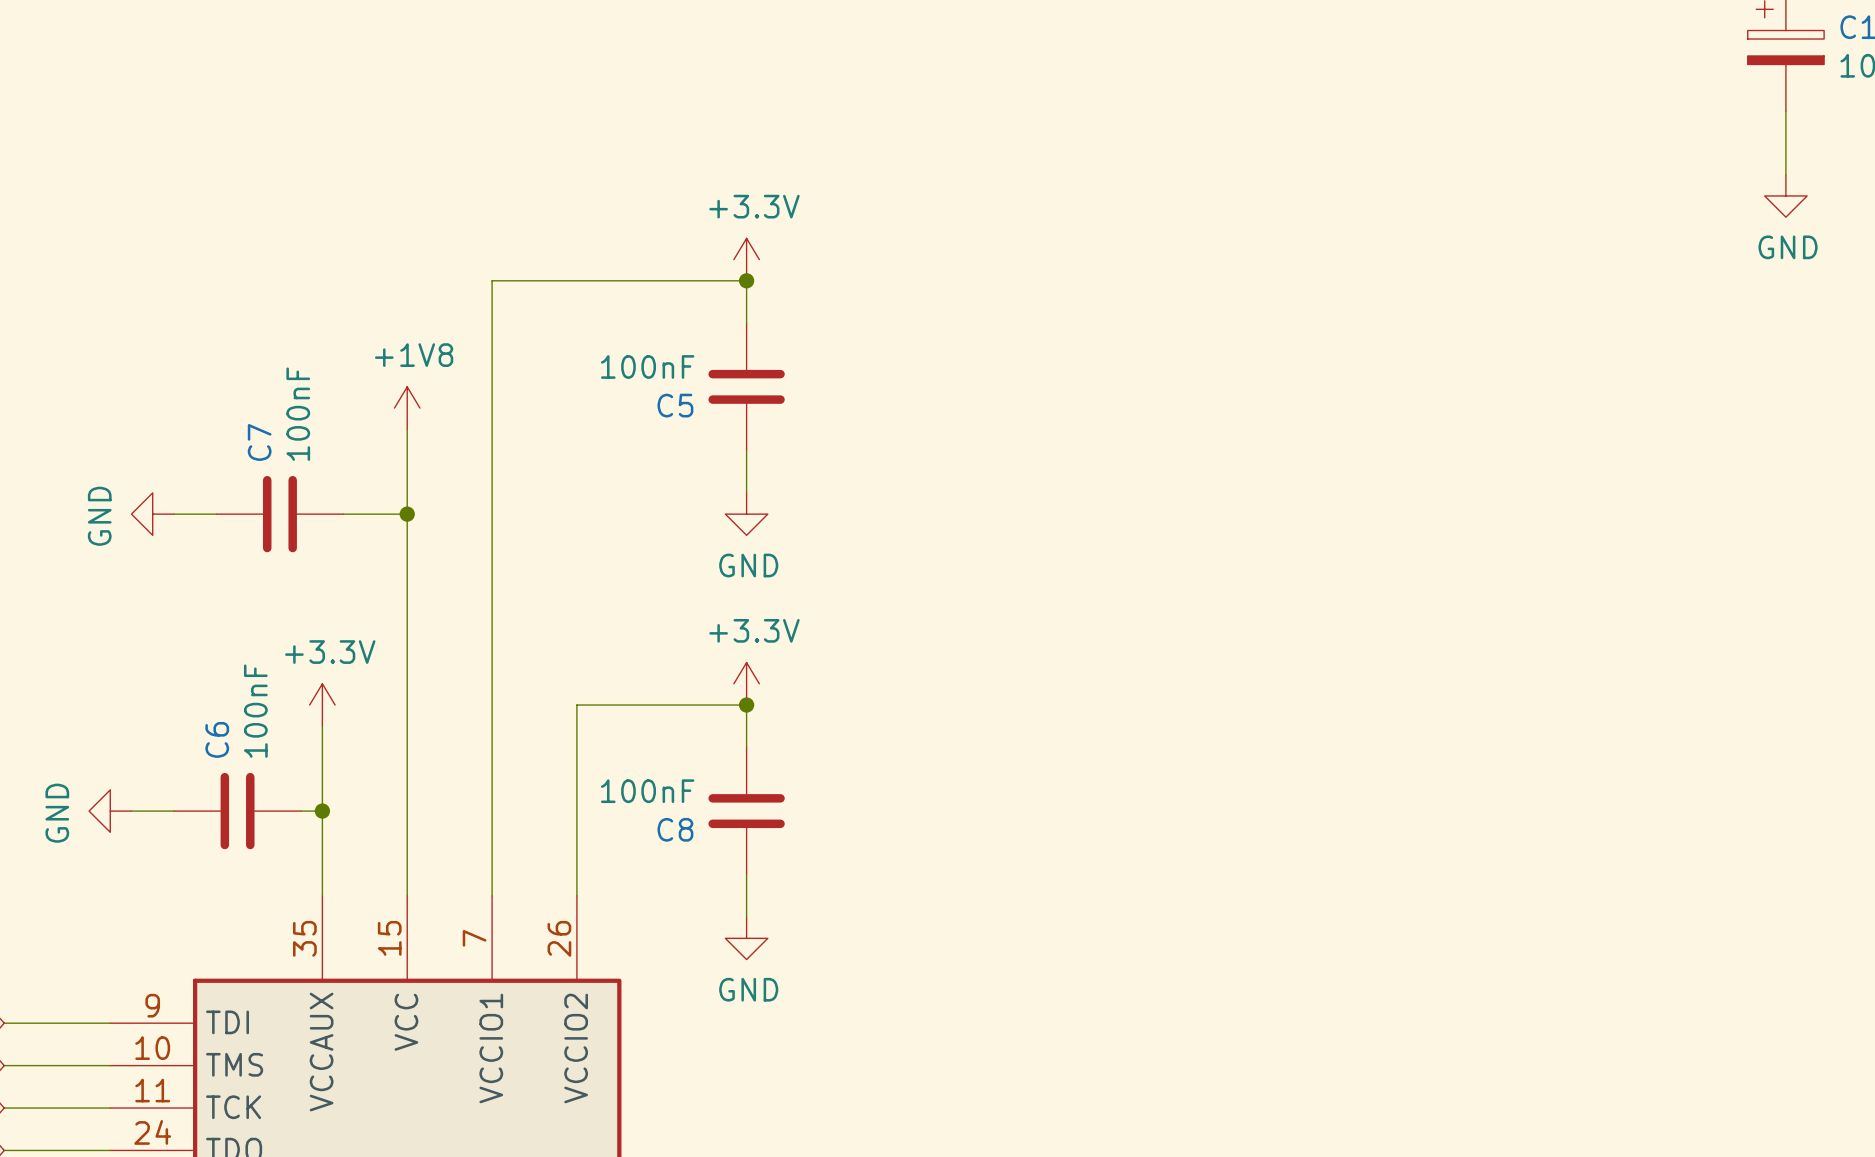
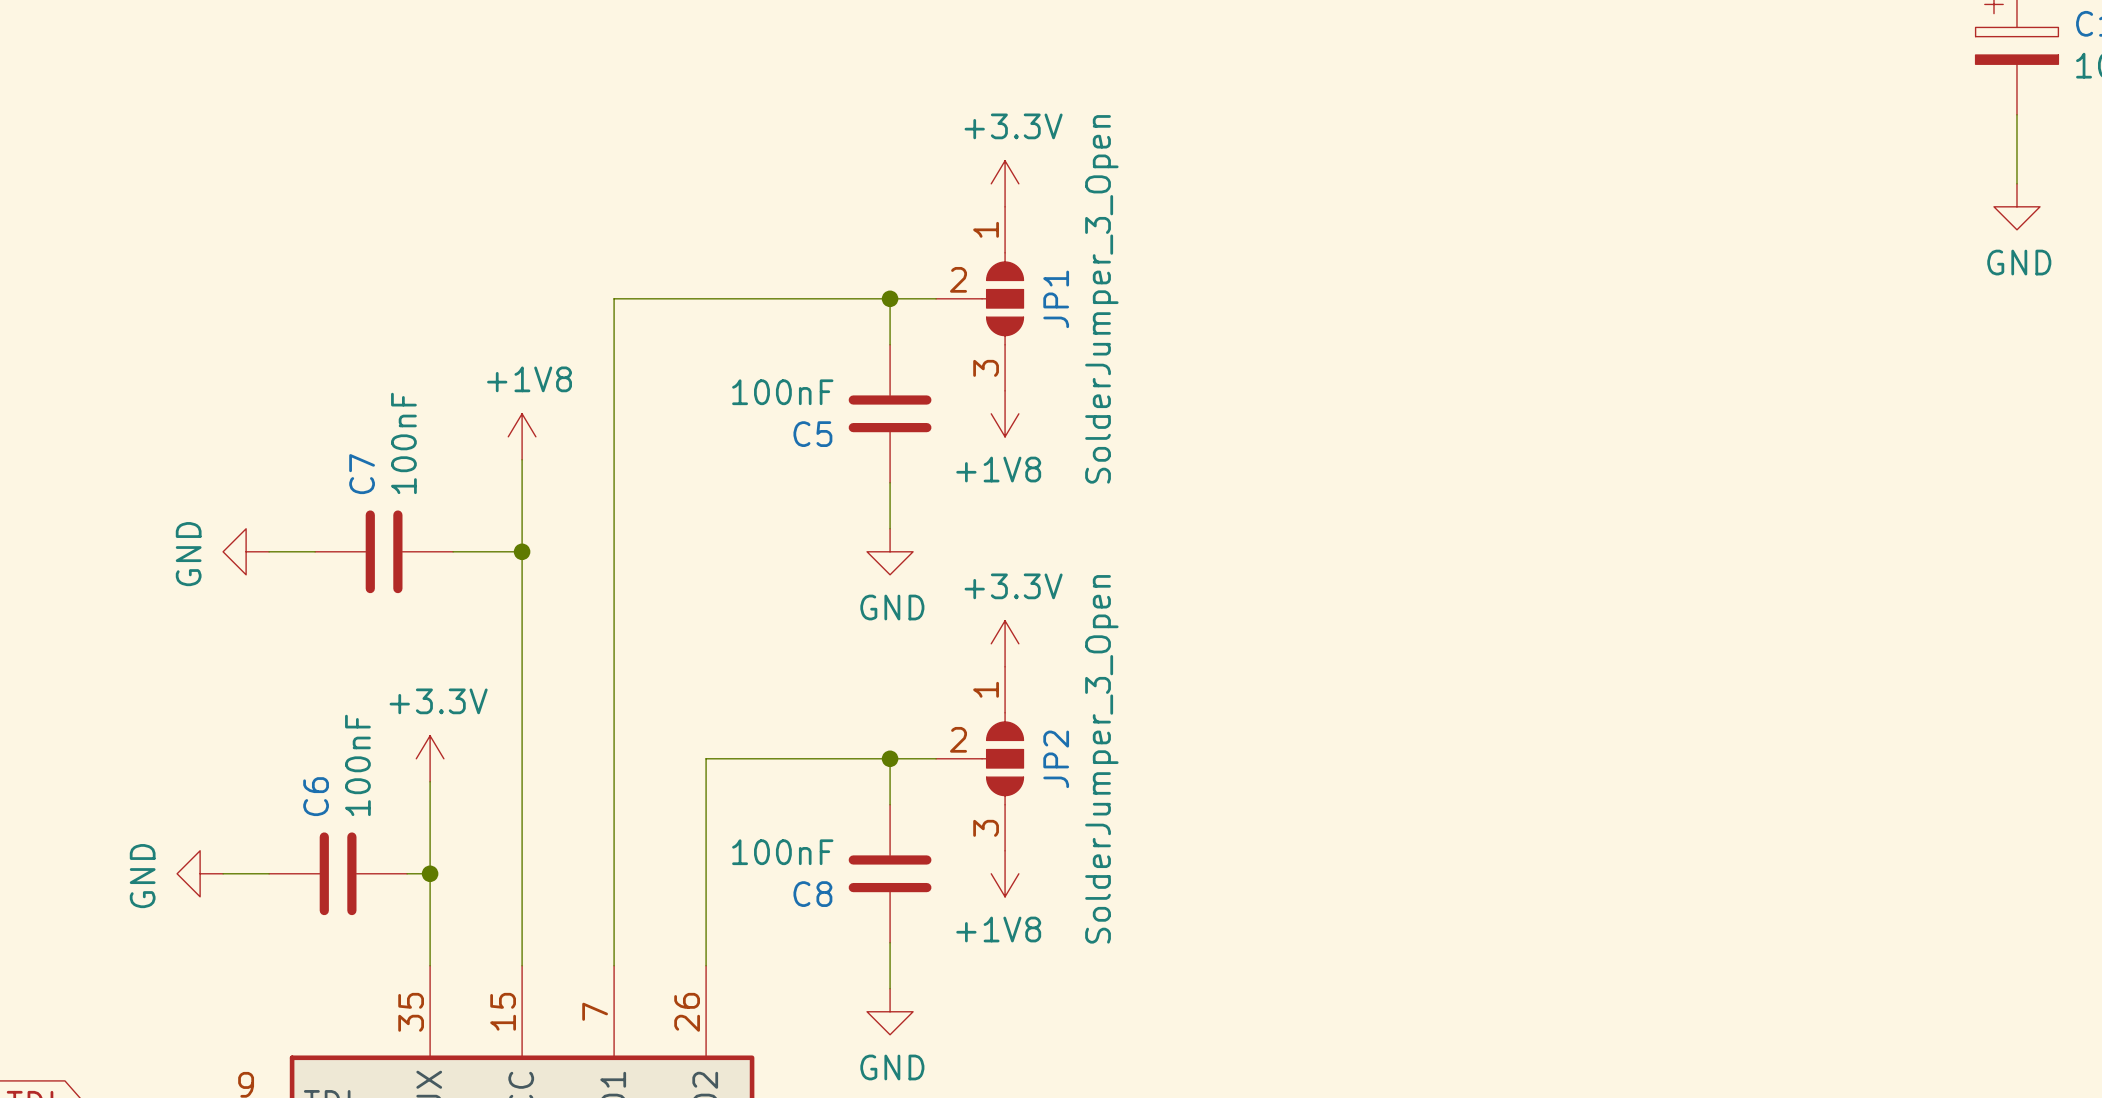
power symbol position: +3.3V (746, 259) -> +3.3V (1005, 183)
wire: none -> (890, 298) (936, 298)
JP1: none -> SolderJumper_3_Open (979, 298)
power symbol: none -> +1V8 (1005, 413)
power symbol position: +3.3V (746, 683) -> +3.3V (1005, 643)
wire: none -> (890, 758) (936, 758)
JP2: none -> SolderJumper_3_Open (979, 758)
power symbol: none -> +1V8 (1005, 873)

